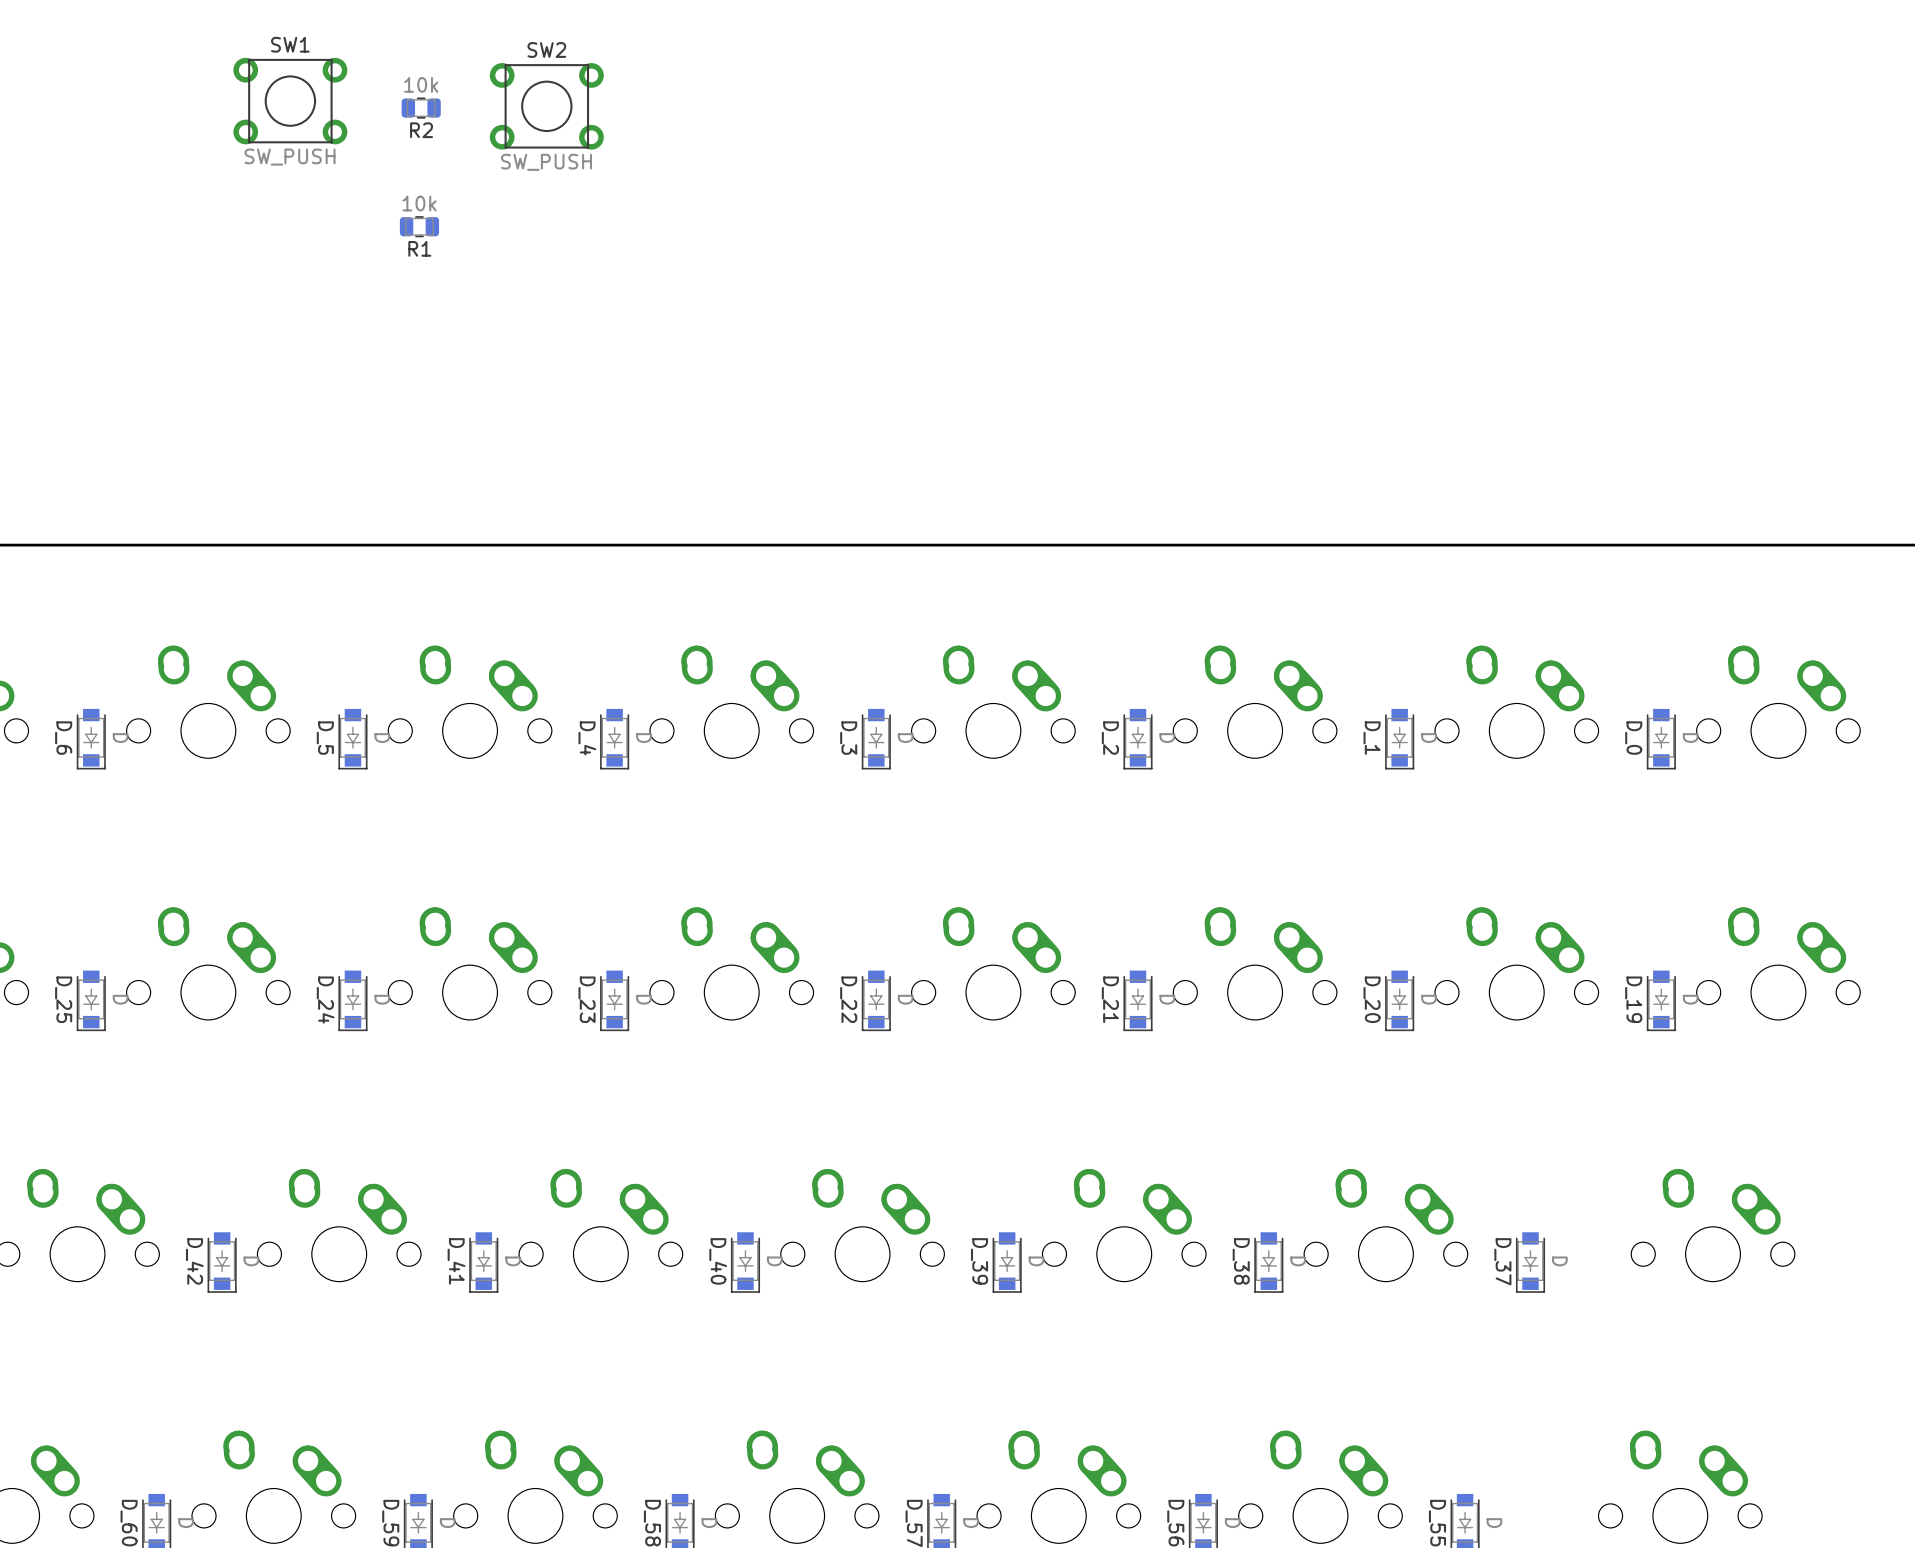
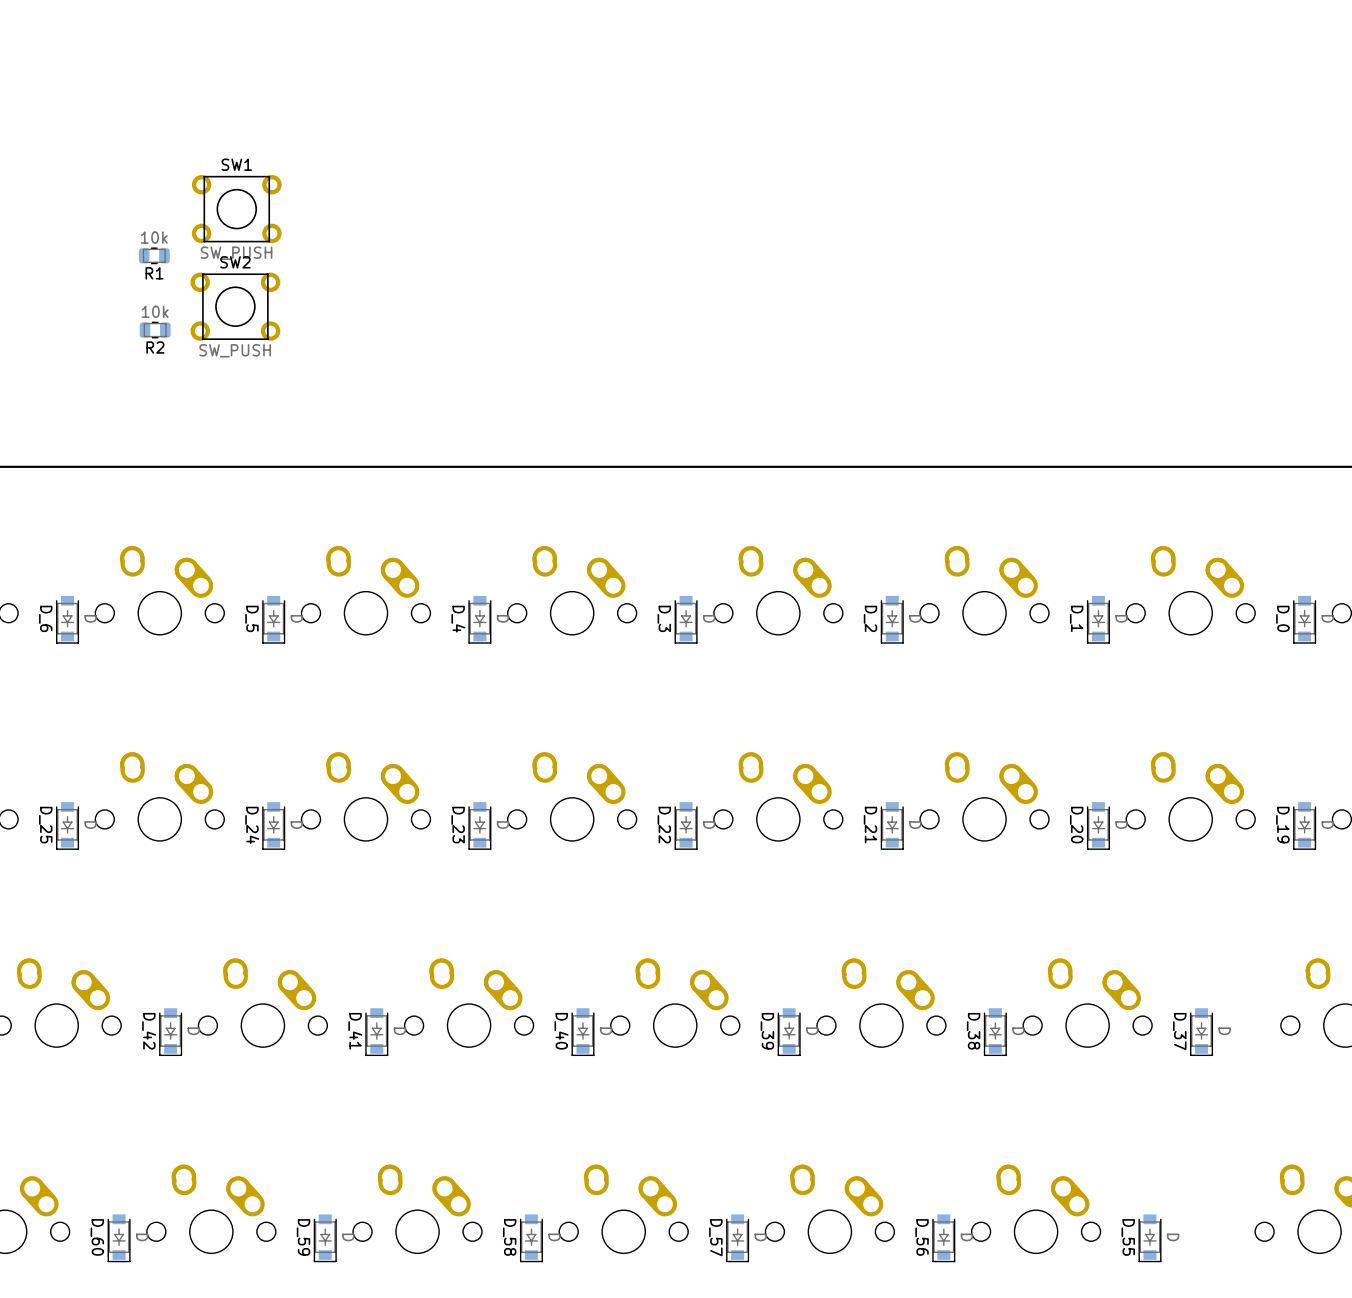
SW1 position: (290, 101) -> (236, 209)
SW2 position: (546, 106) -> (235, 306)
R2 position: (421, 108) -> (155, 330)
R1 position: (419, 226) -> (154, 255)

